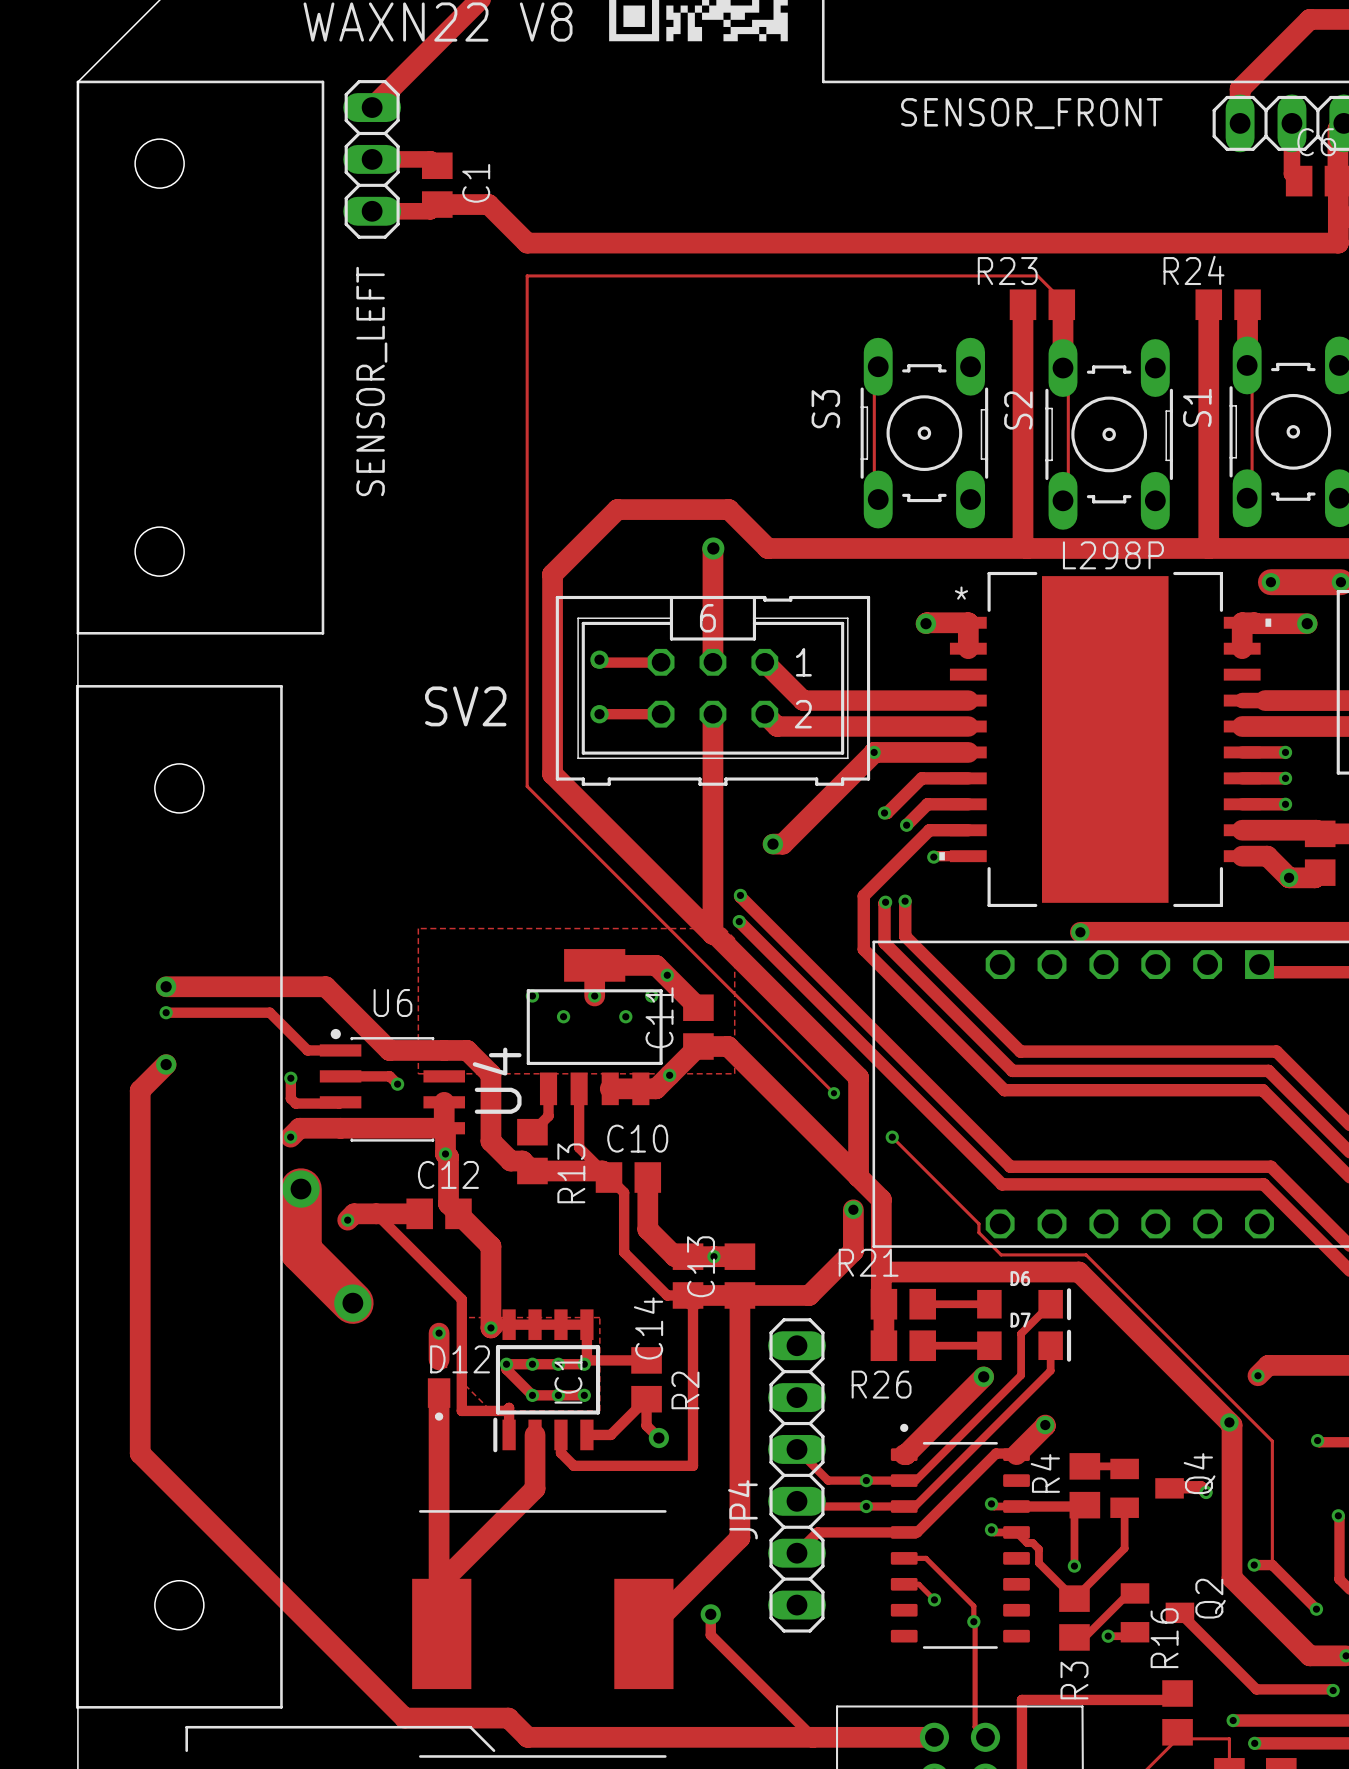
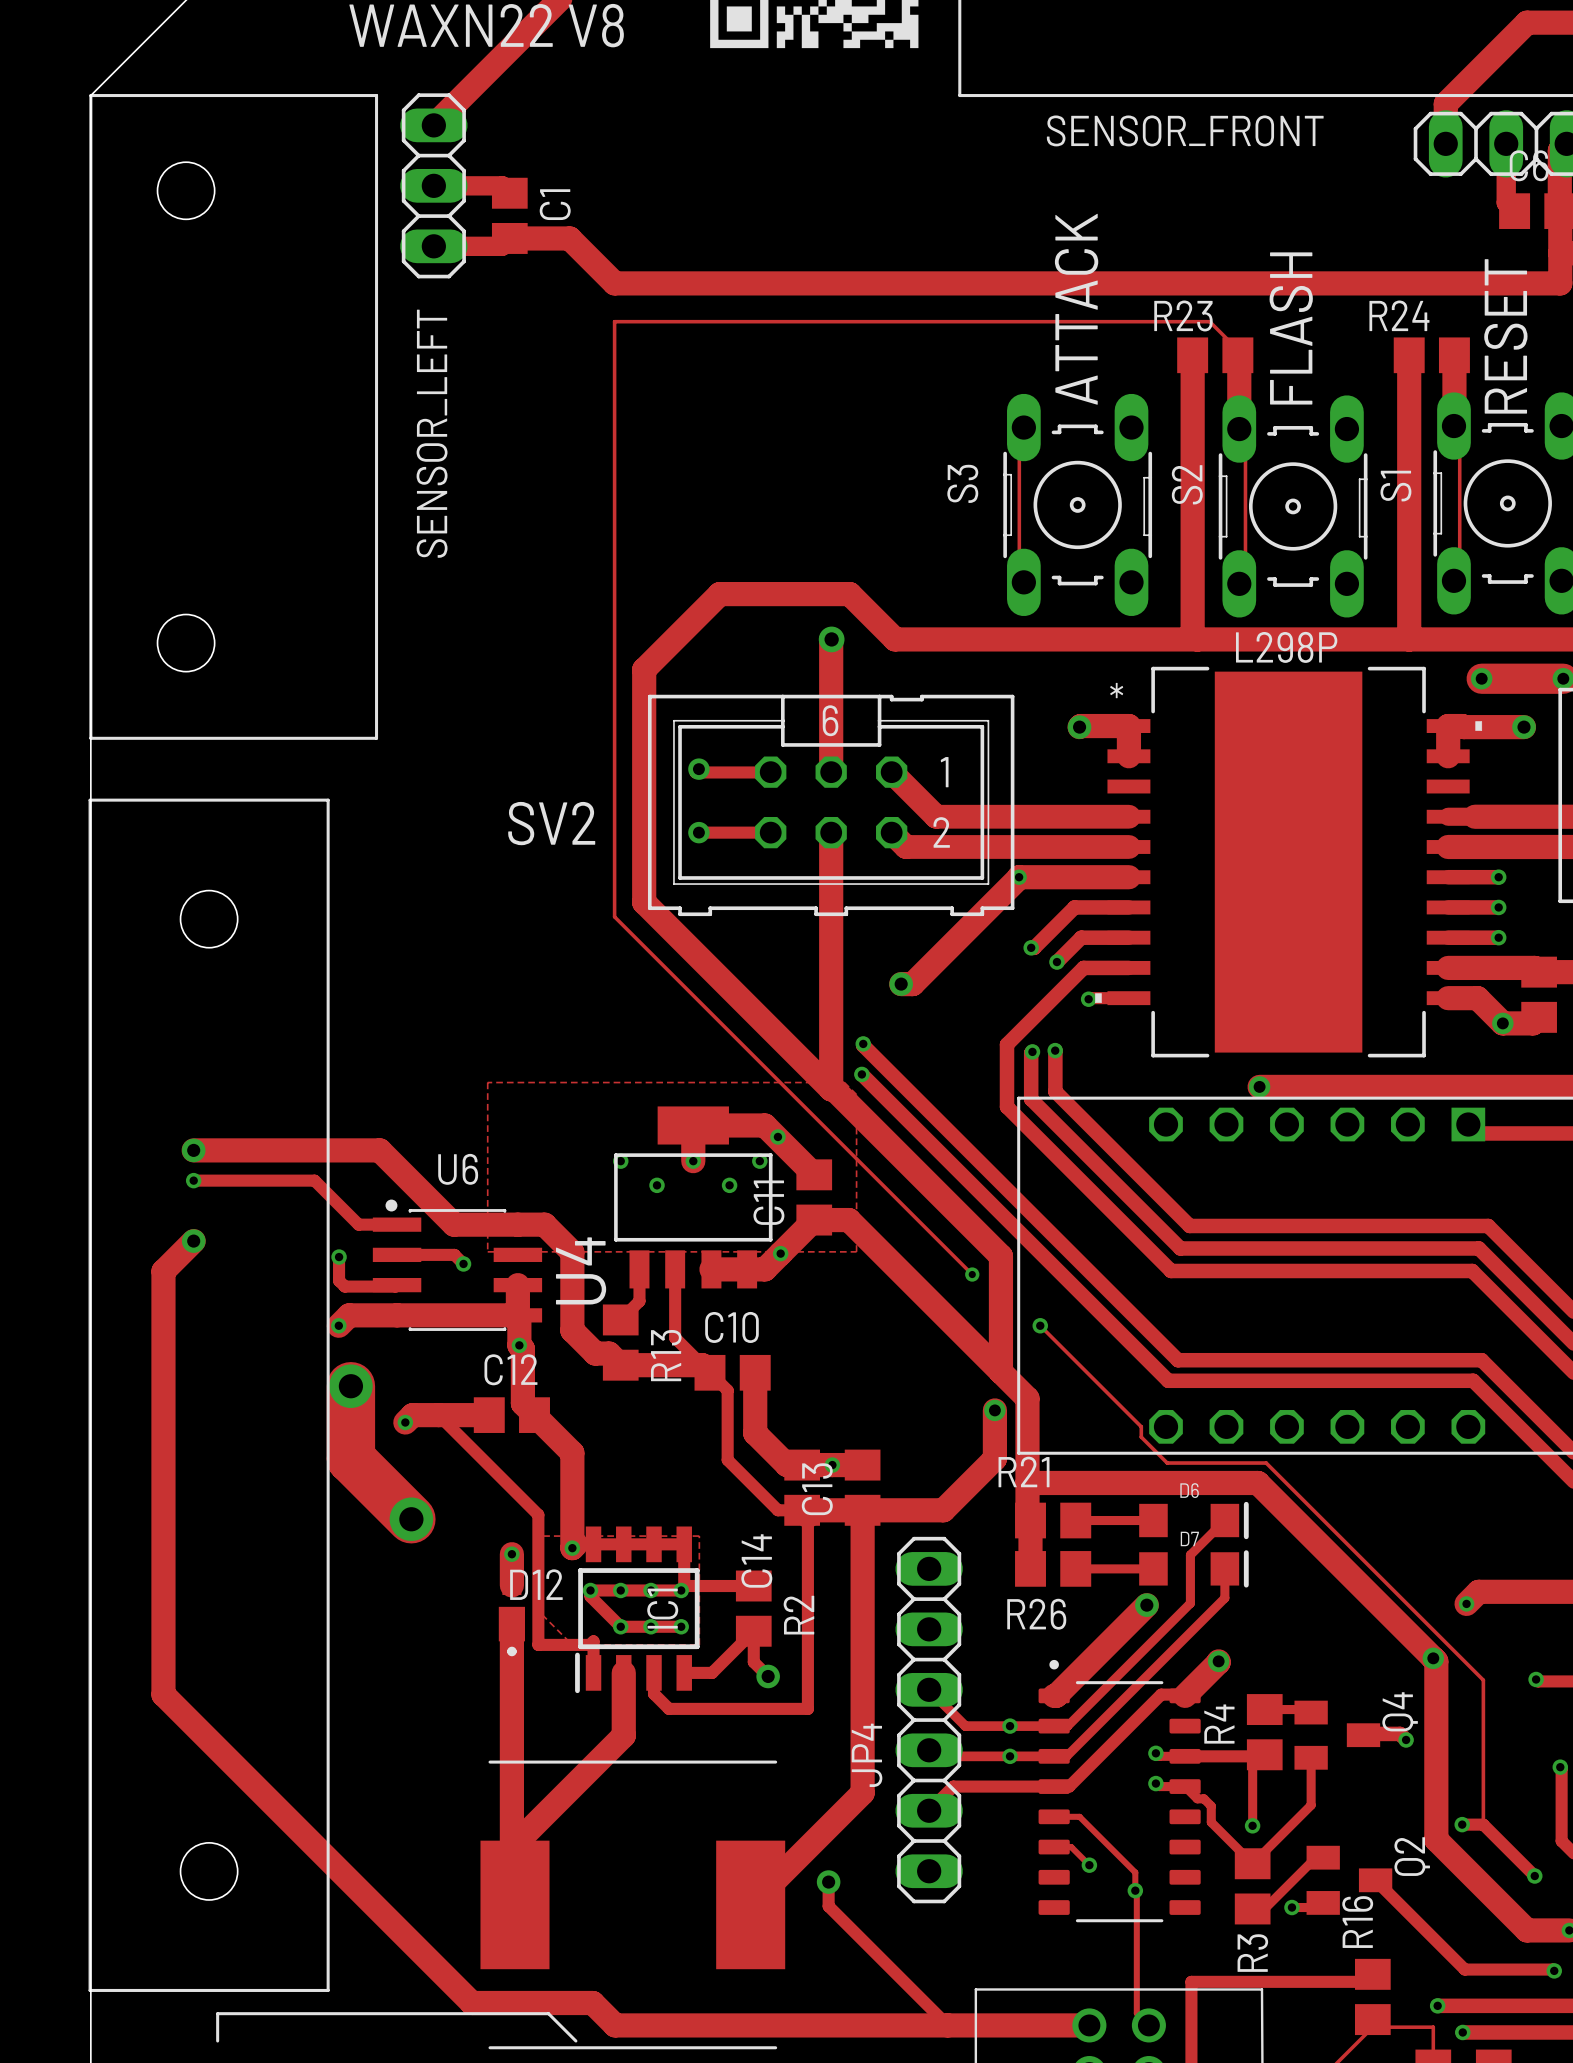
text: none -> ATTACK (1076, 309)
text: none -> FLASH (1291, 328)
text: none -> RESET (1505, 336)

